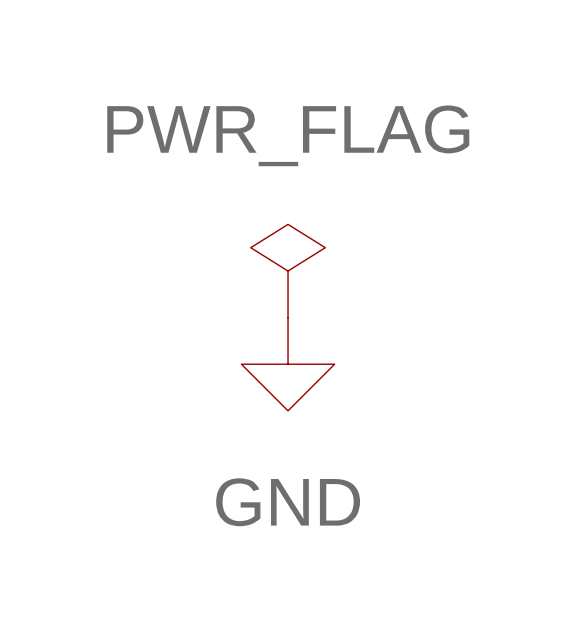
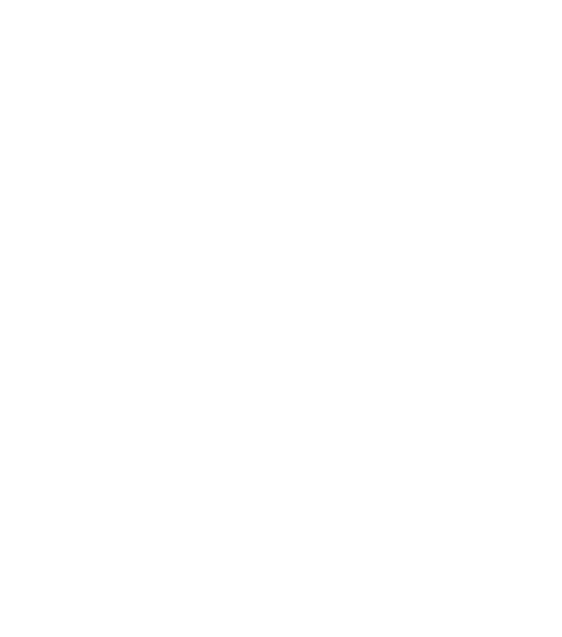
power symbol: PWR_FLAG (288, 271) -> none
power symbol: GND (288, 364) -> none

